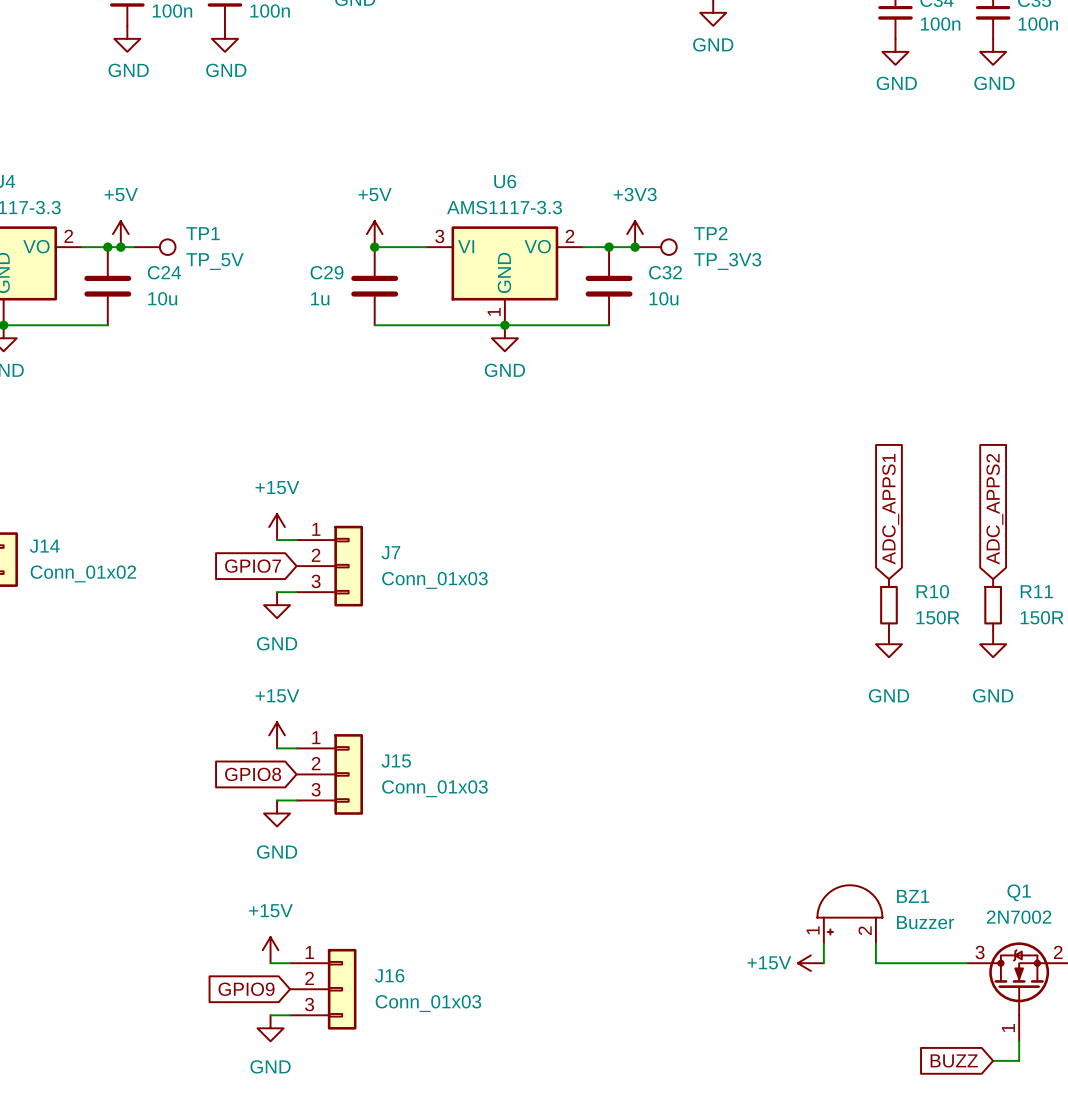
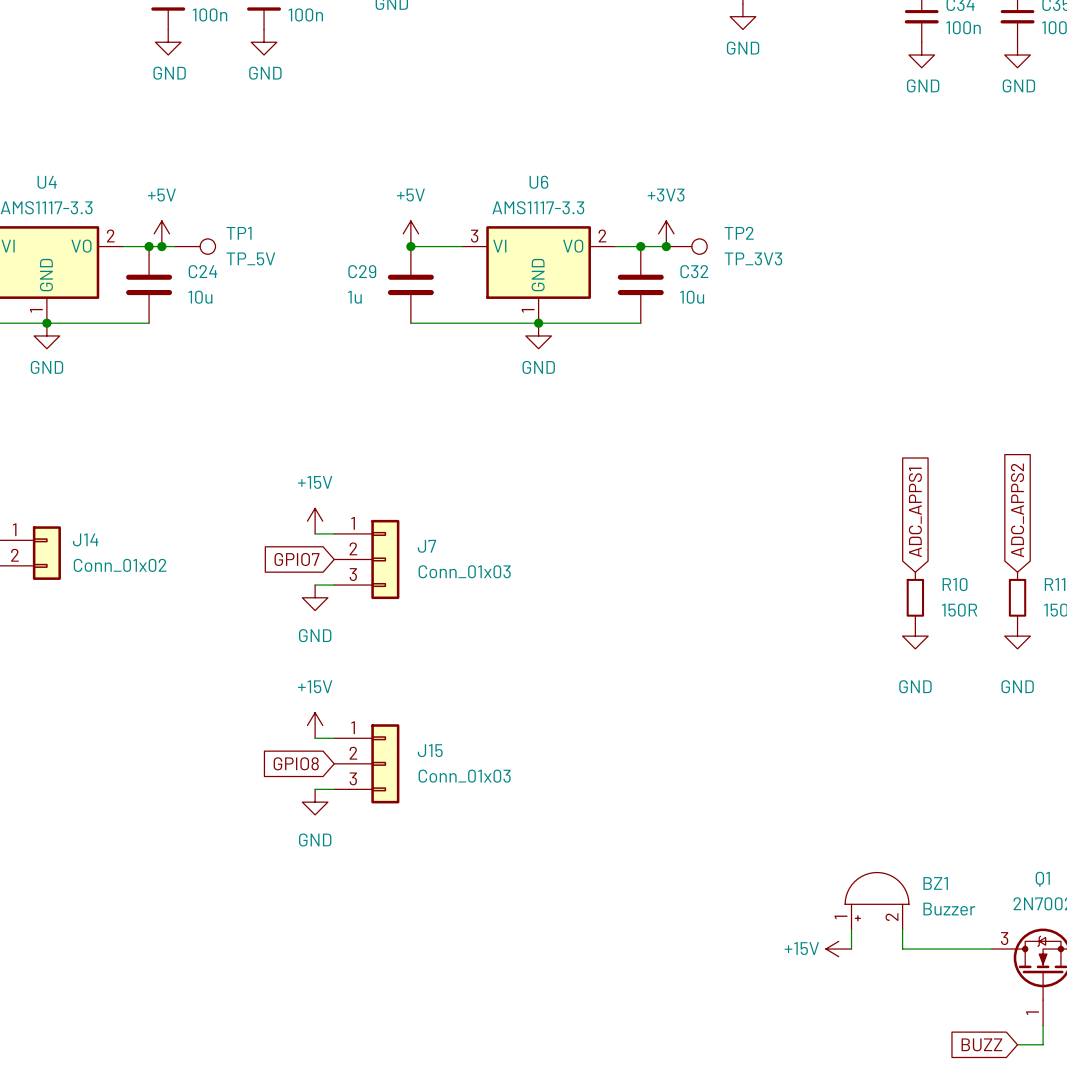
power symbol: +15V (270, 950) -> none
wire: (270, 963) (290, 963) -> none
global label: GPIO9 (246, 989) -> none
J16: Conn_01x03 (323, 989) -> none
wire: (270, 1015) (290, 1015) -> none
power symbol: GND (270, 1028) -> none

